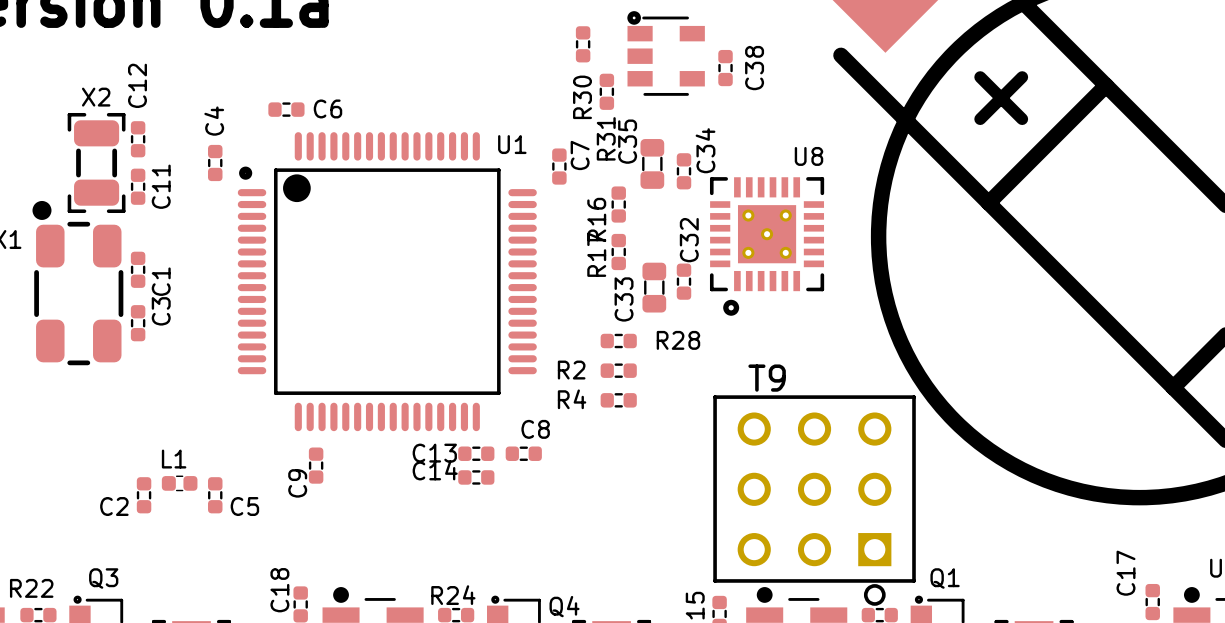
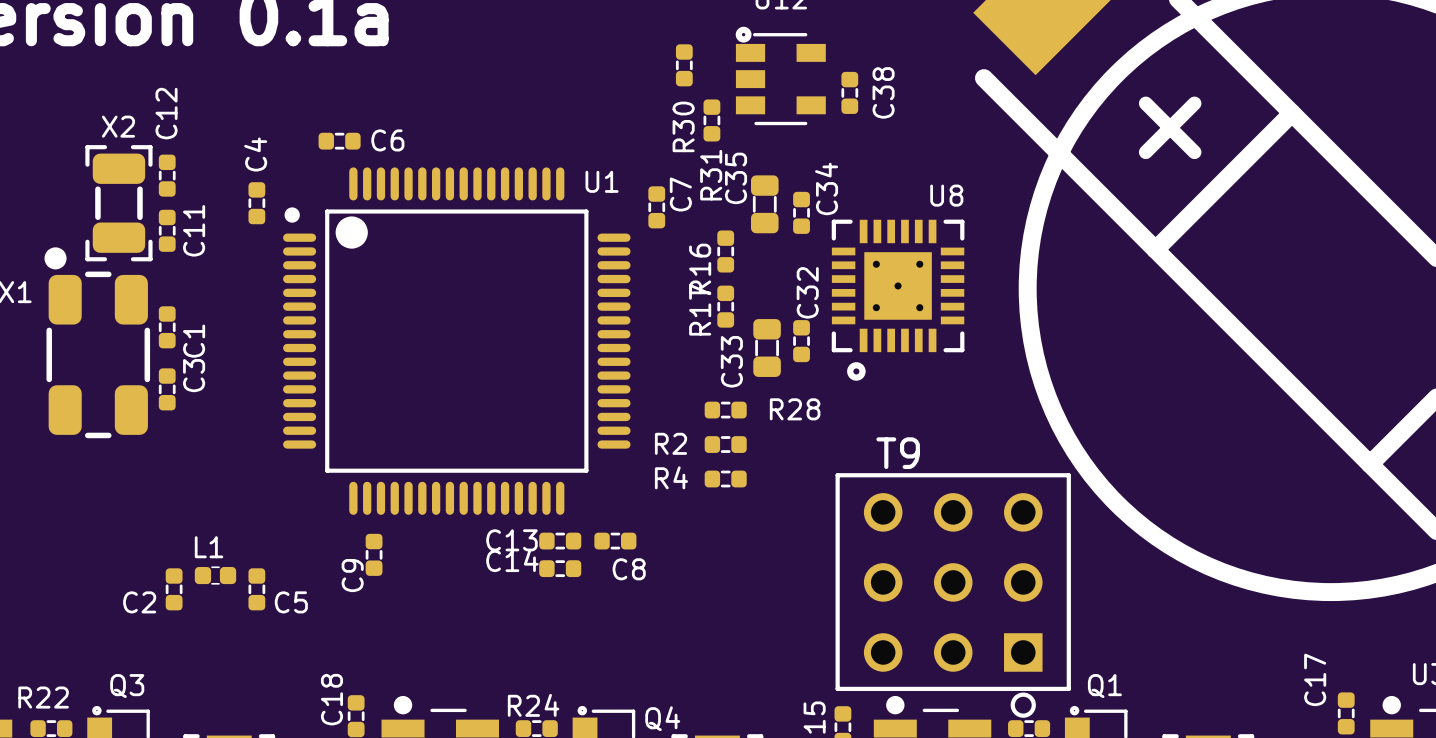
C8 name position: C8 (535, 429) -> C8 (629, 569)

